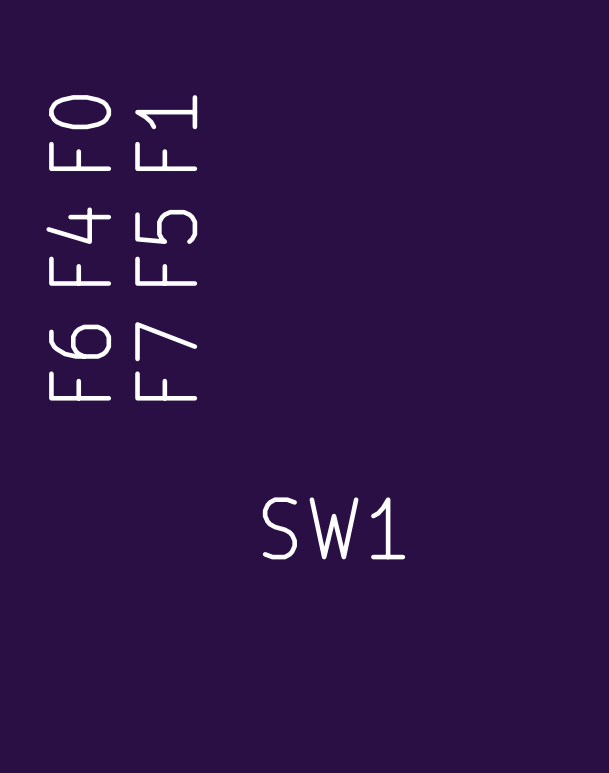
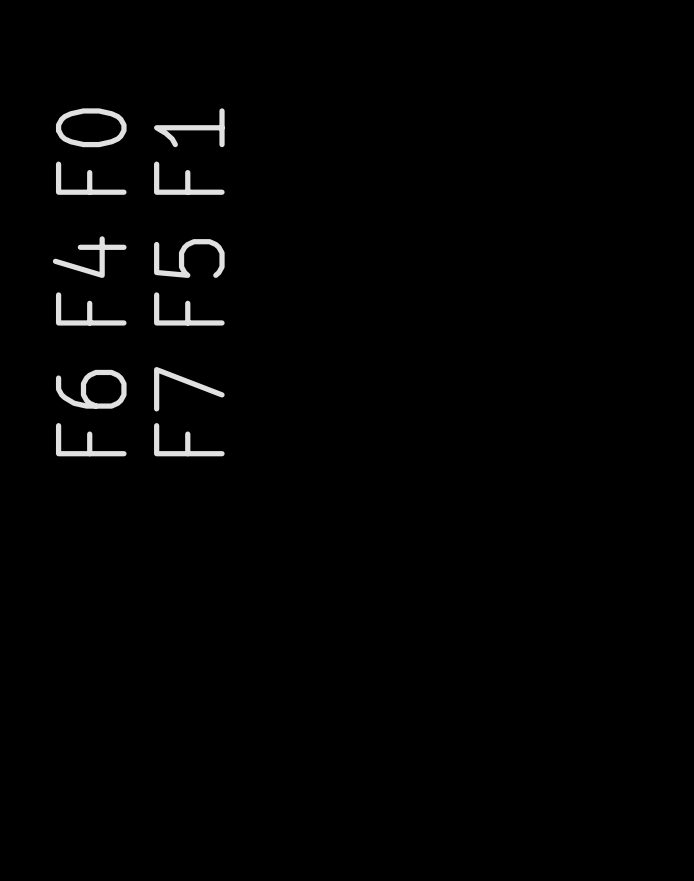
text: SW1 (334, 528) -> none

